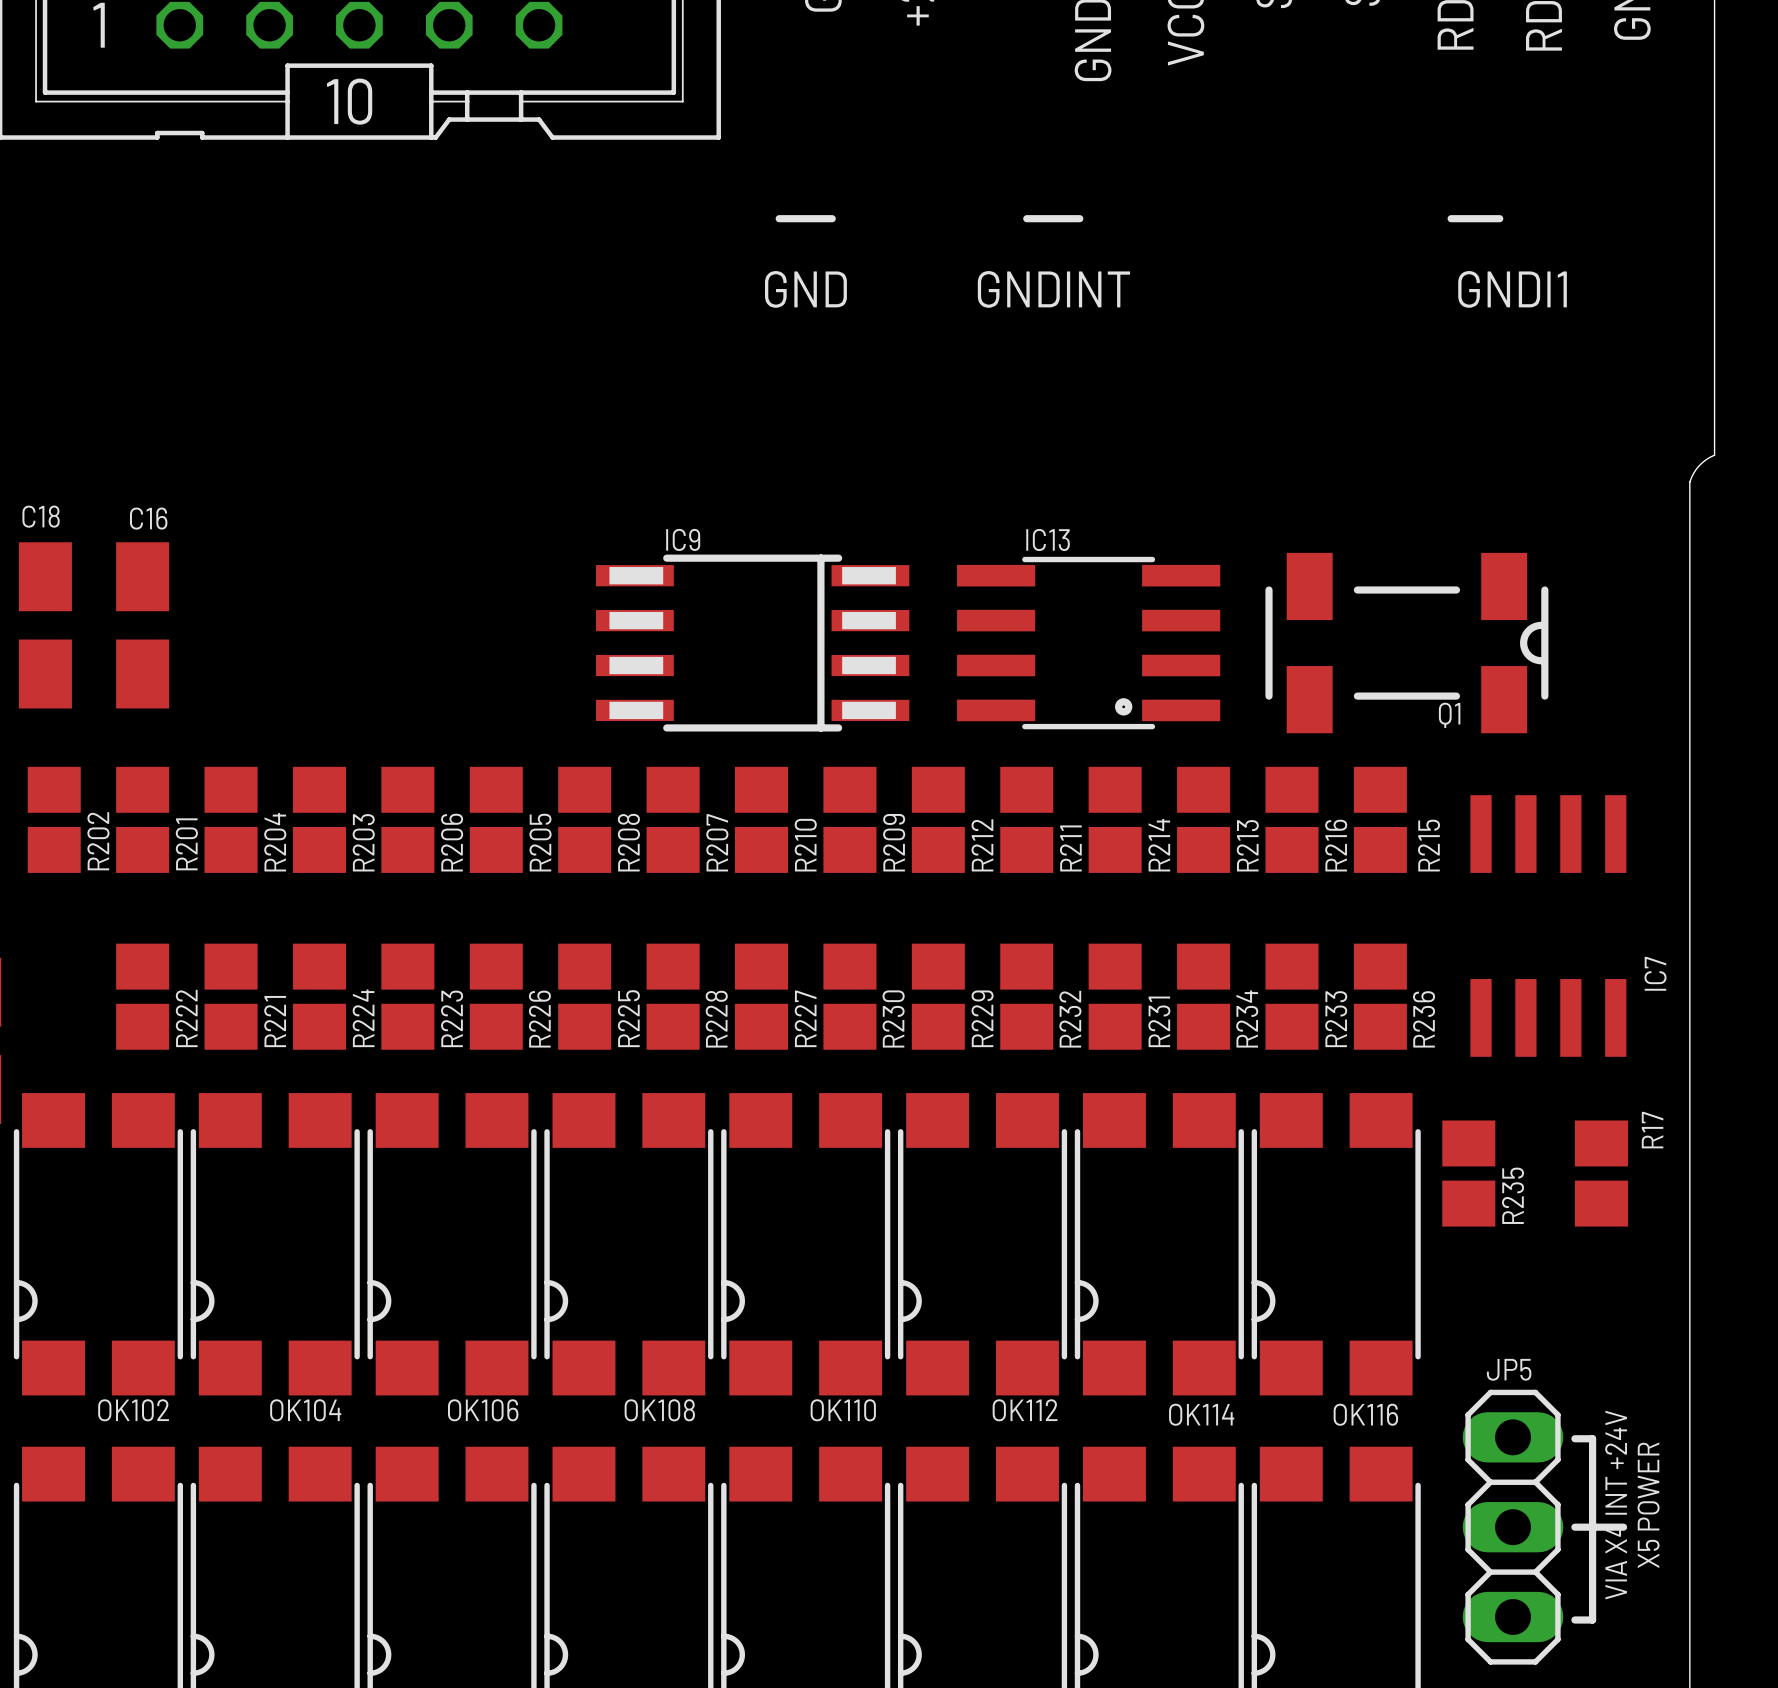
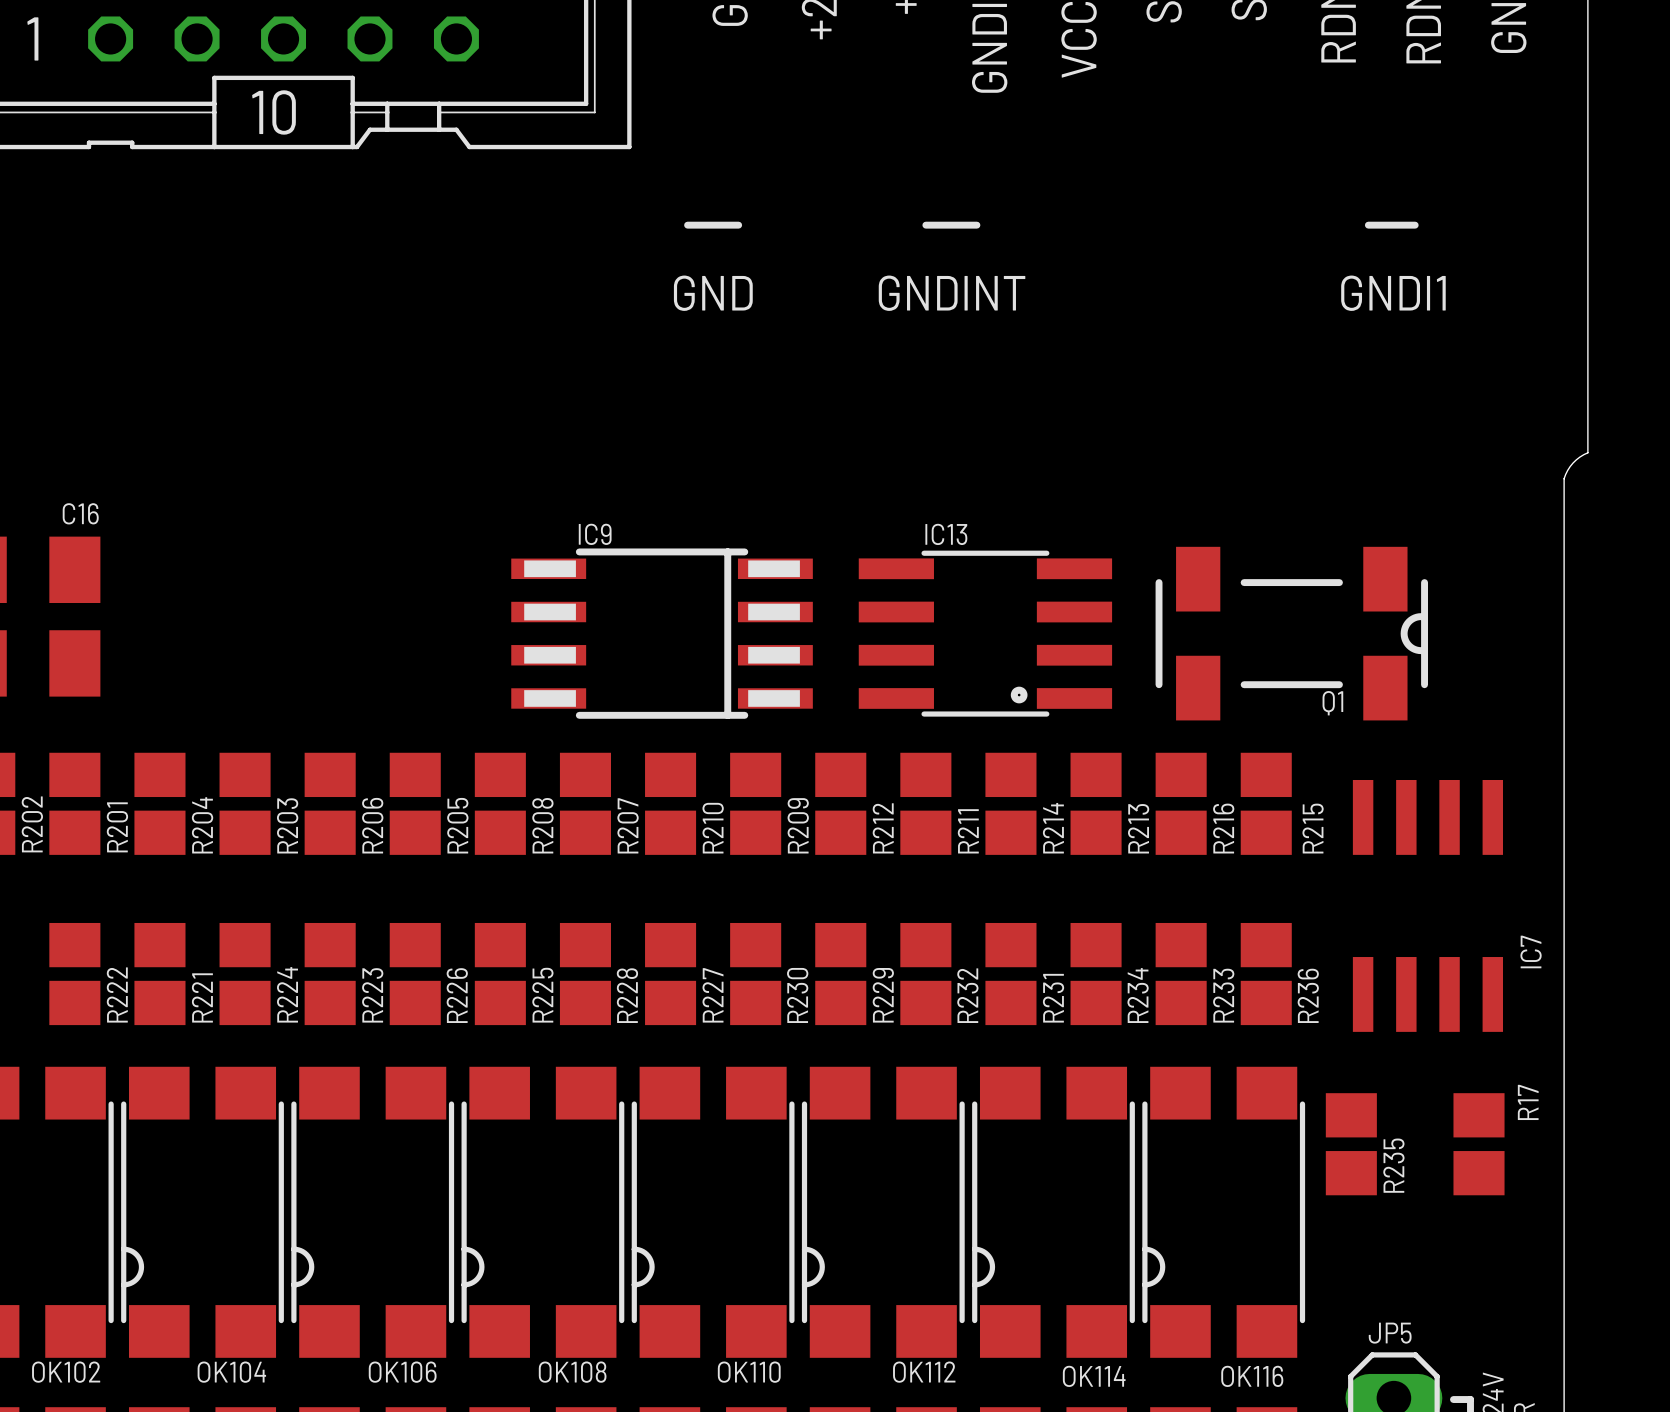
line: (1451, 218) (1486, 218) -> (1381, 225) (1415, 225)

